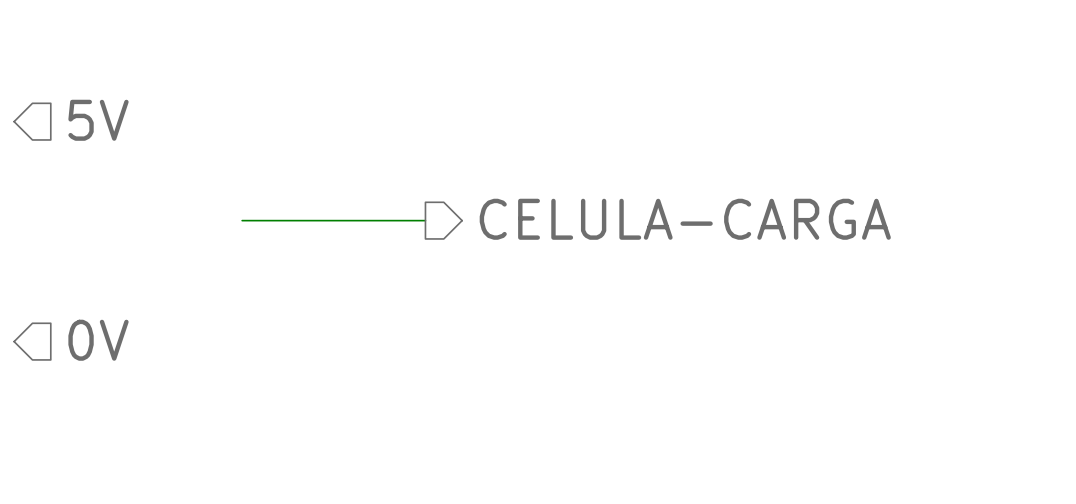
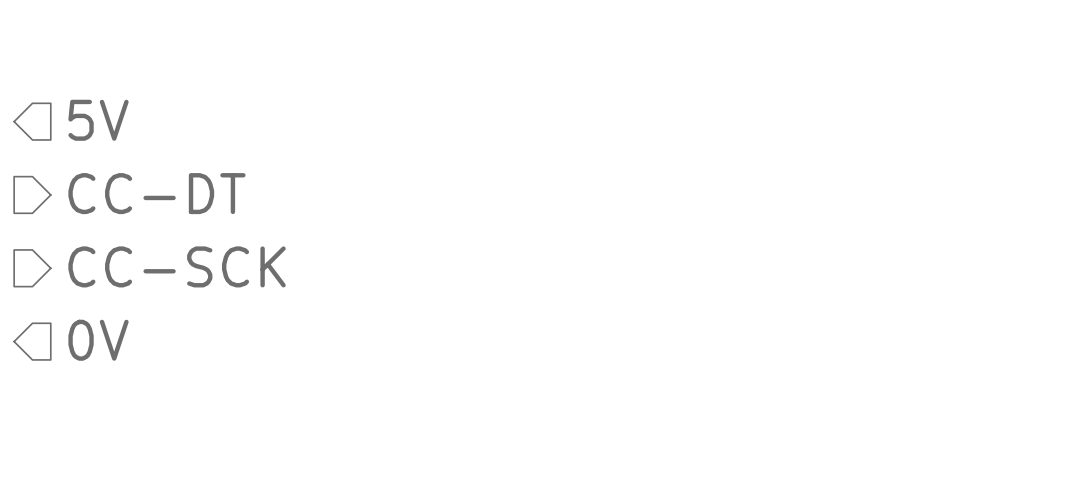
hierarchical label: none -> CC-DT (156, 193)
hierarchical label: CELULA-CARGA (685, 219) -> none
wire: (242, 220) (425, 220) -> none
hierarchical label: none -> CC-SCK (177, 266)

